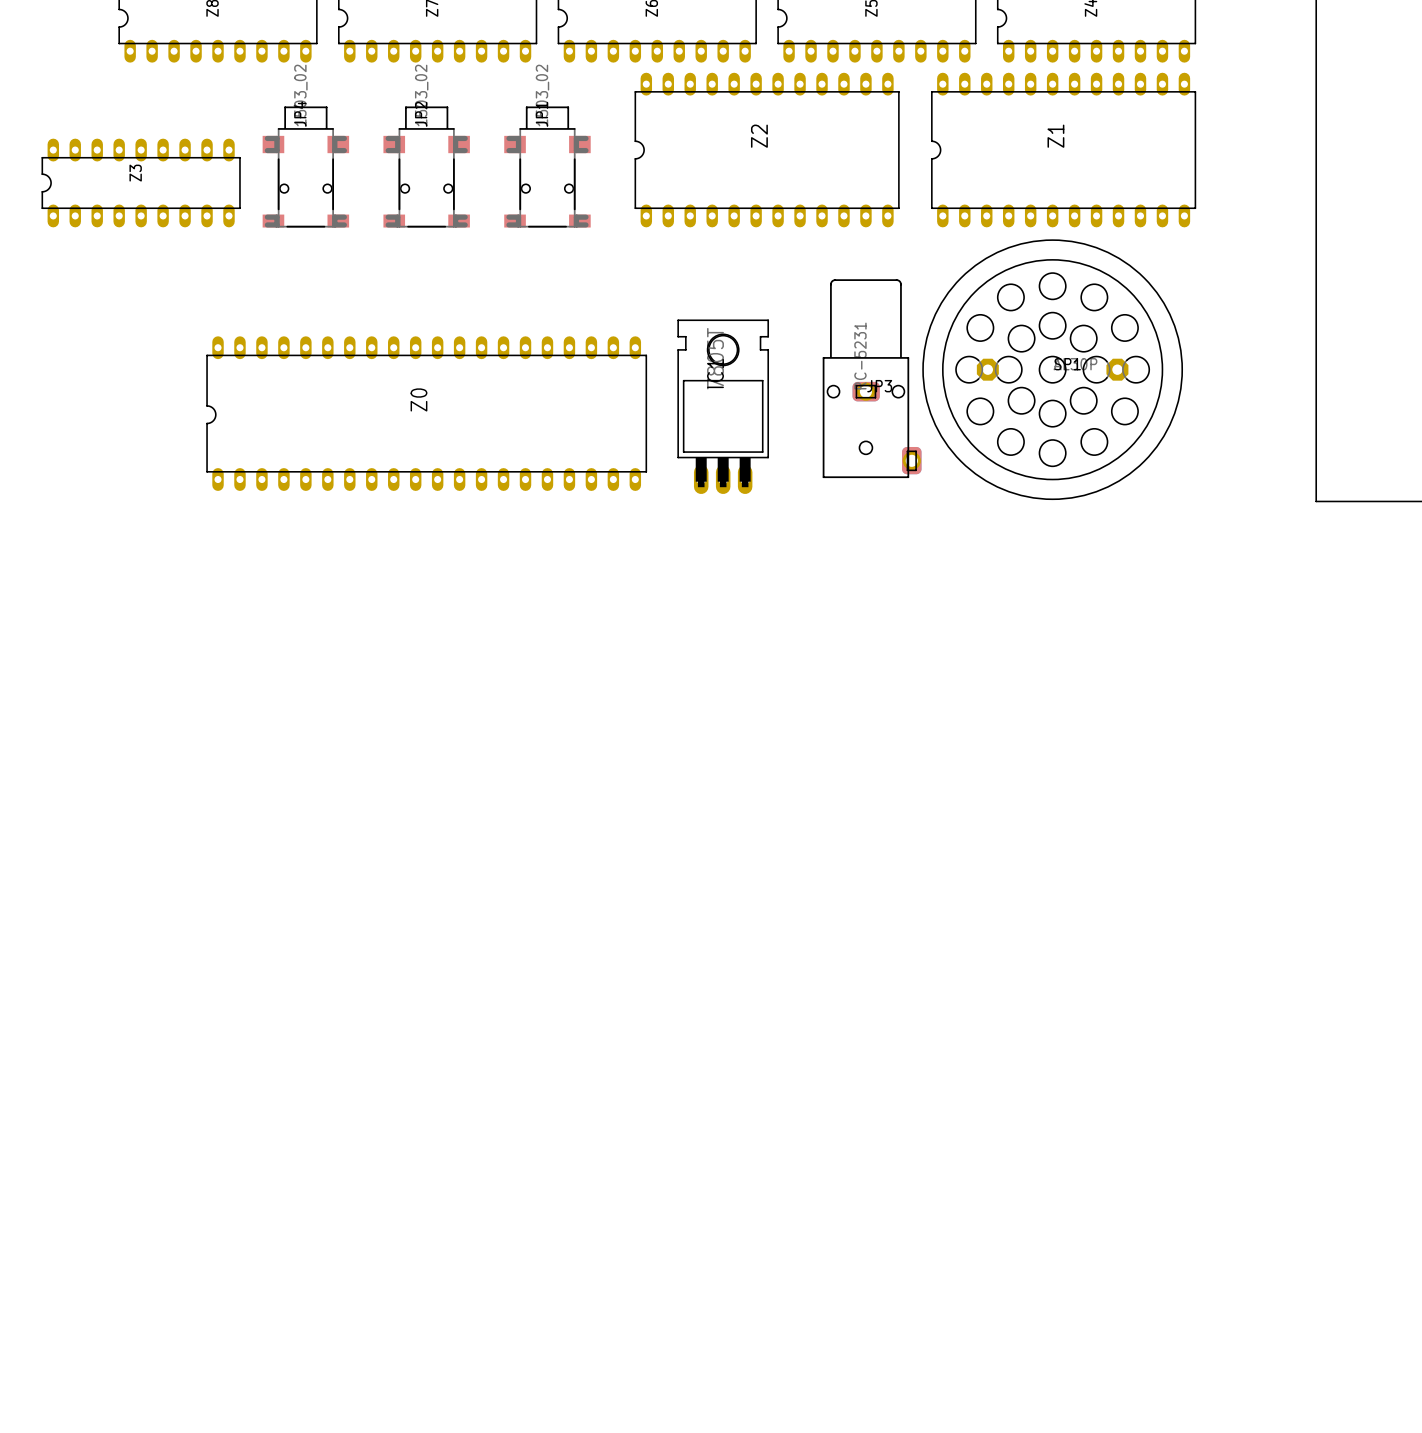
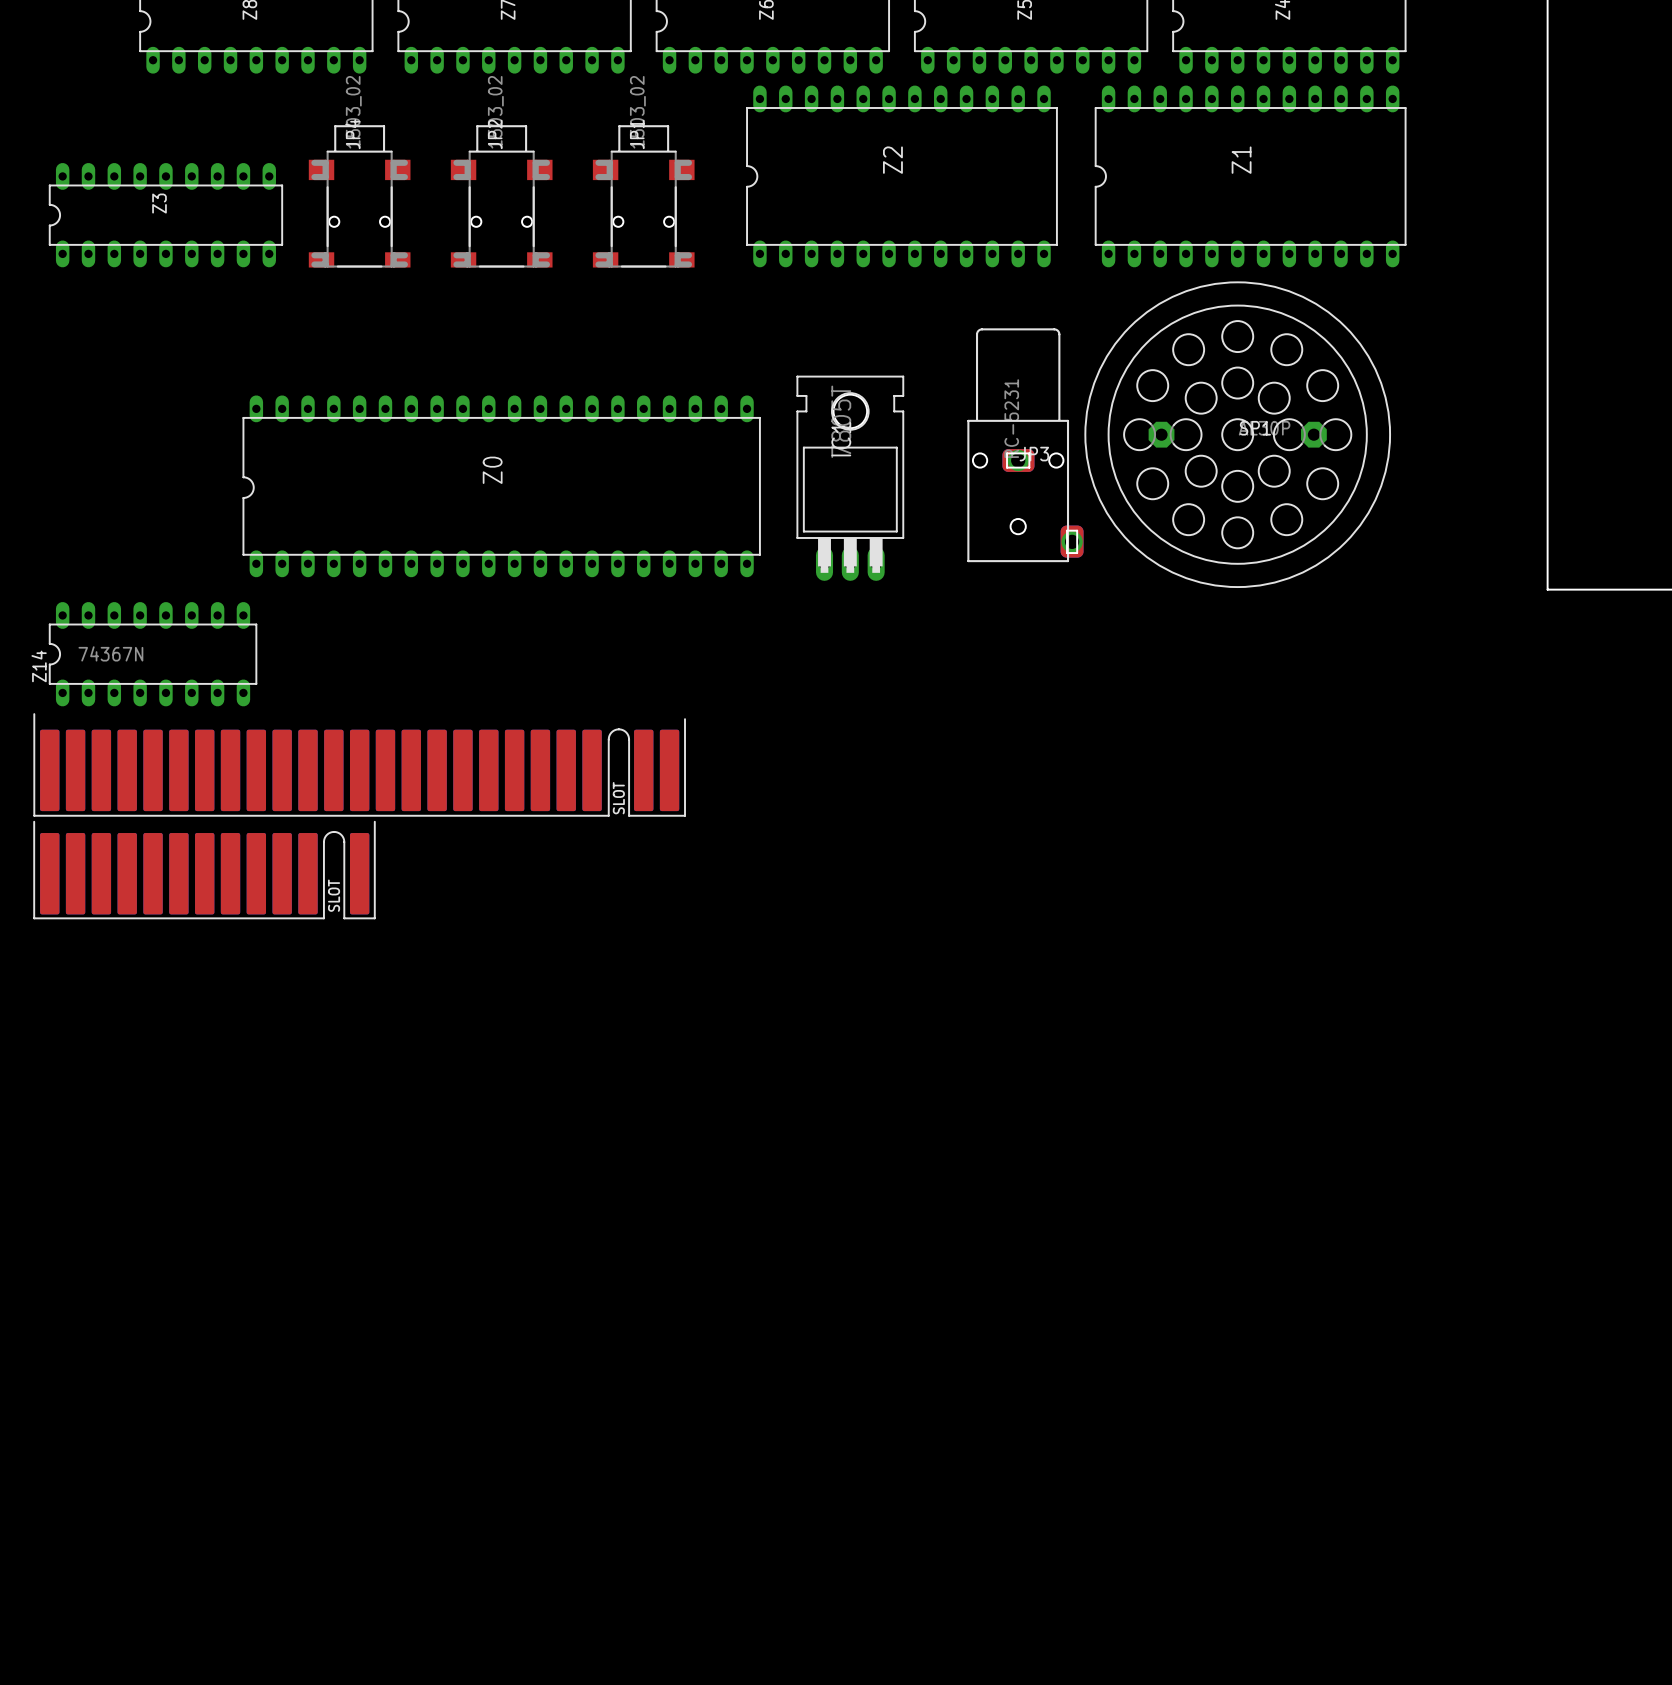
Z14: none -> 74367N (153, 654)
part: none -> (359, 764)
part: none -> (204, 870)

